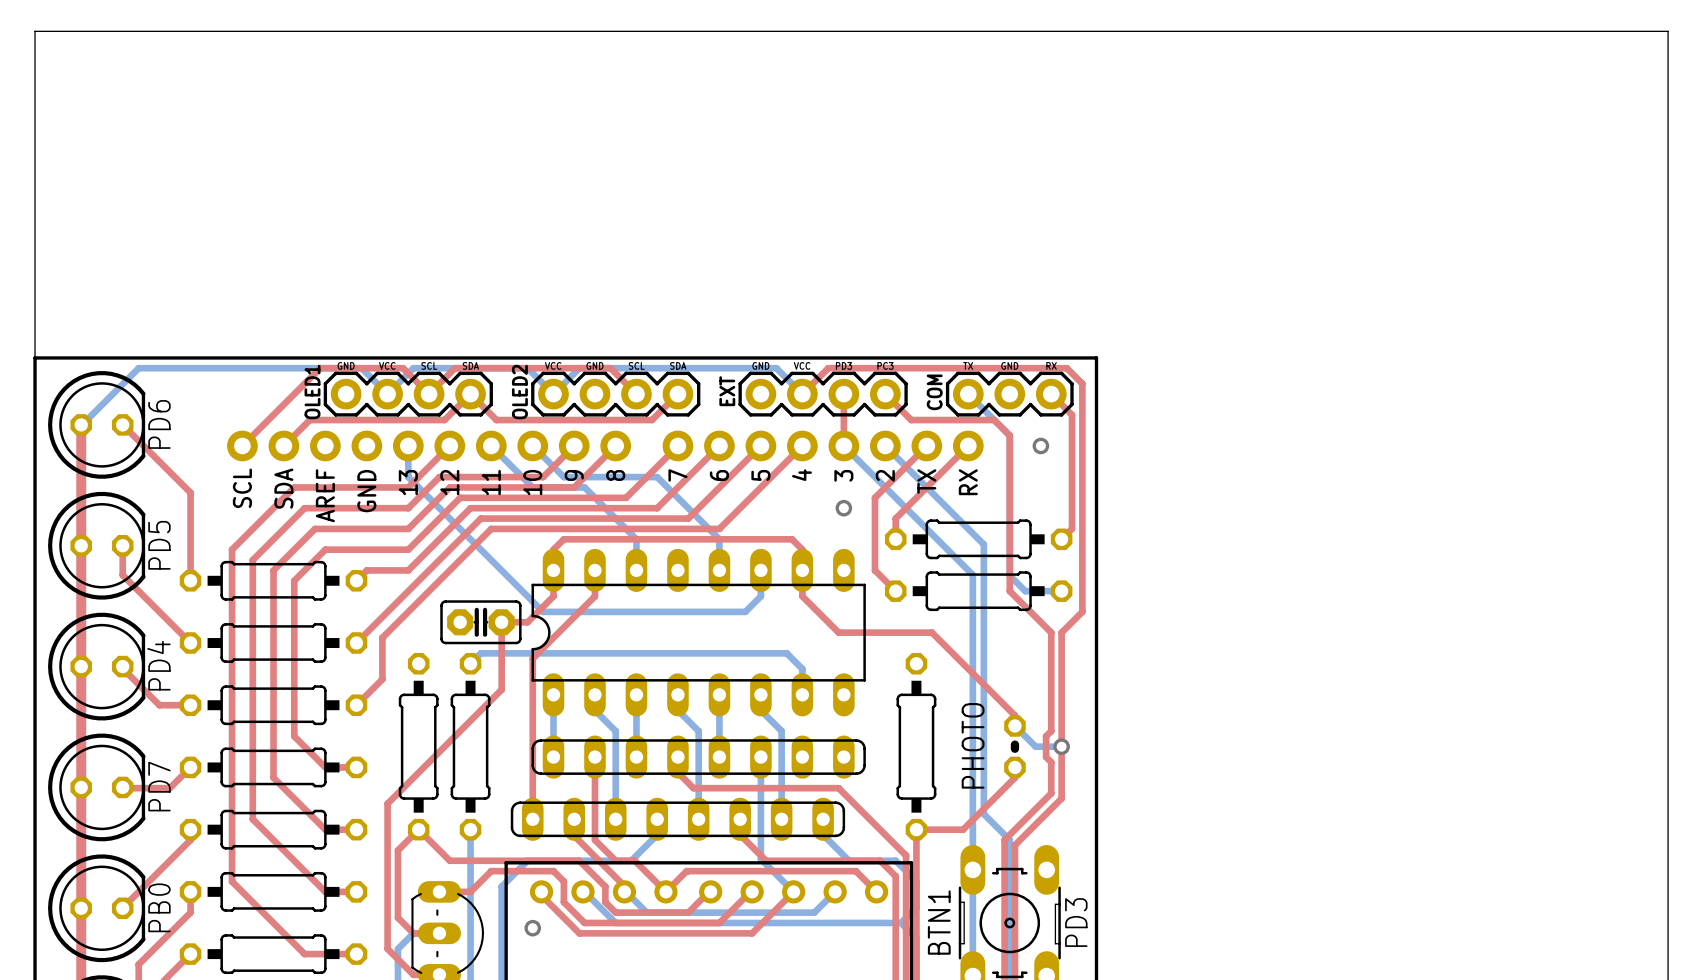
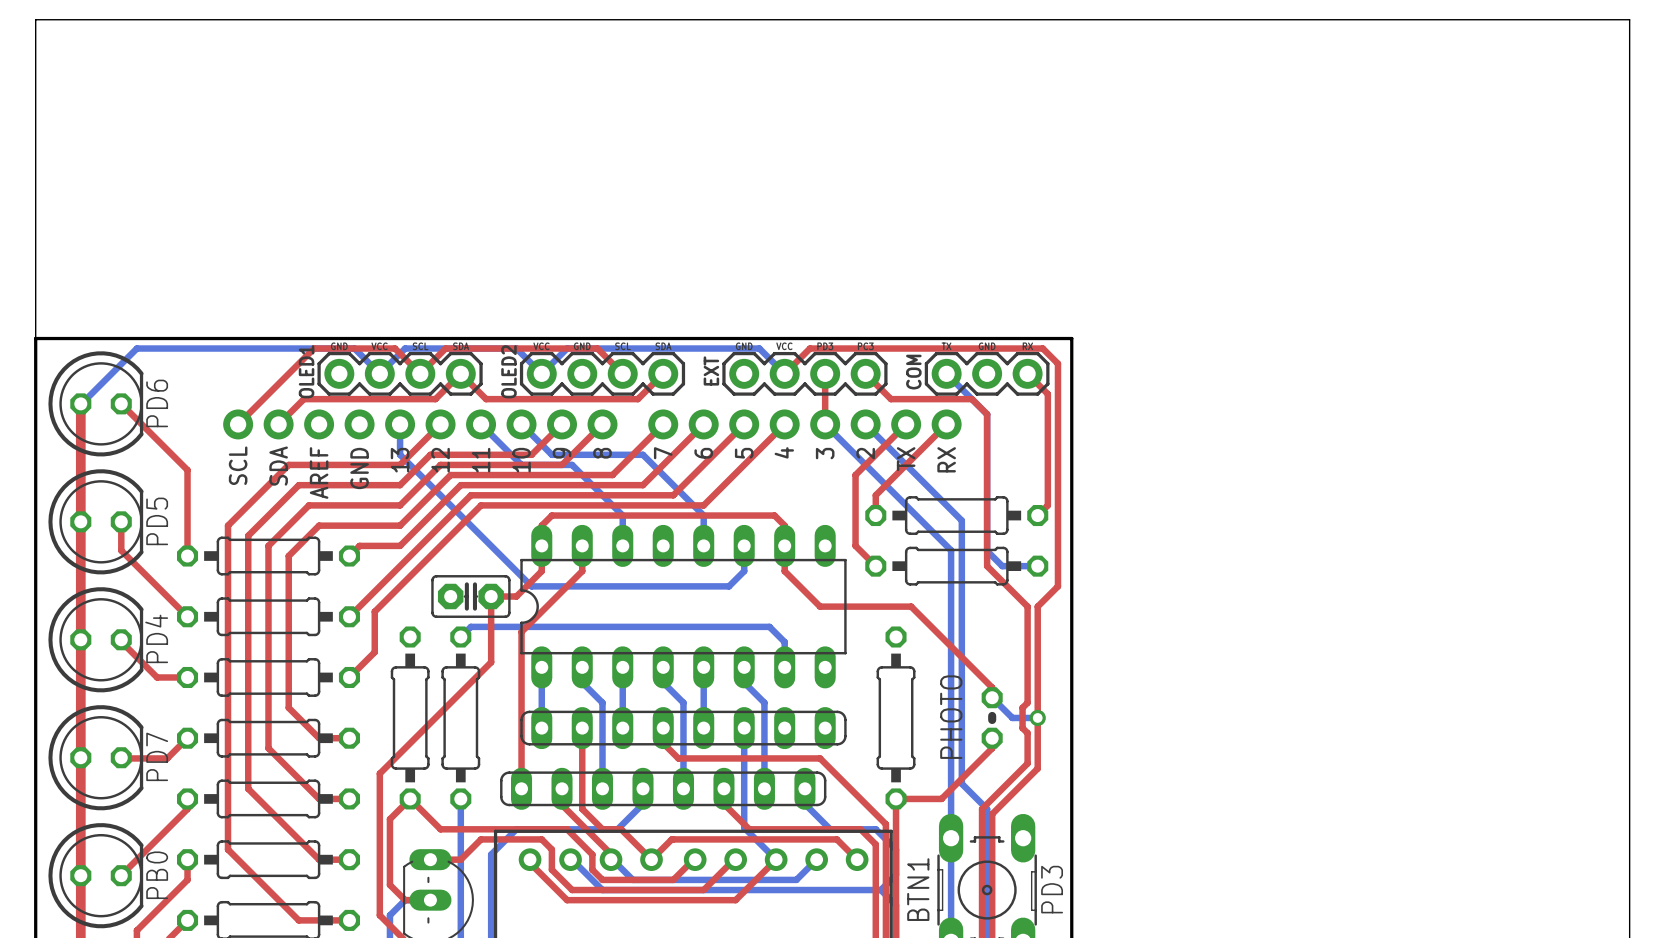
via: (1040, 445) -> none
via: (843, 508) -> none
via: (532, 928) -> none

